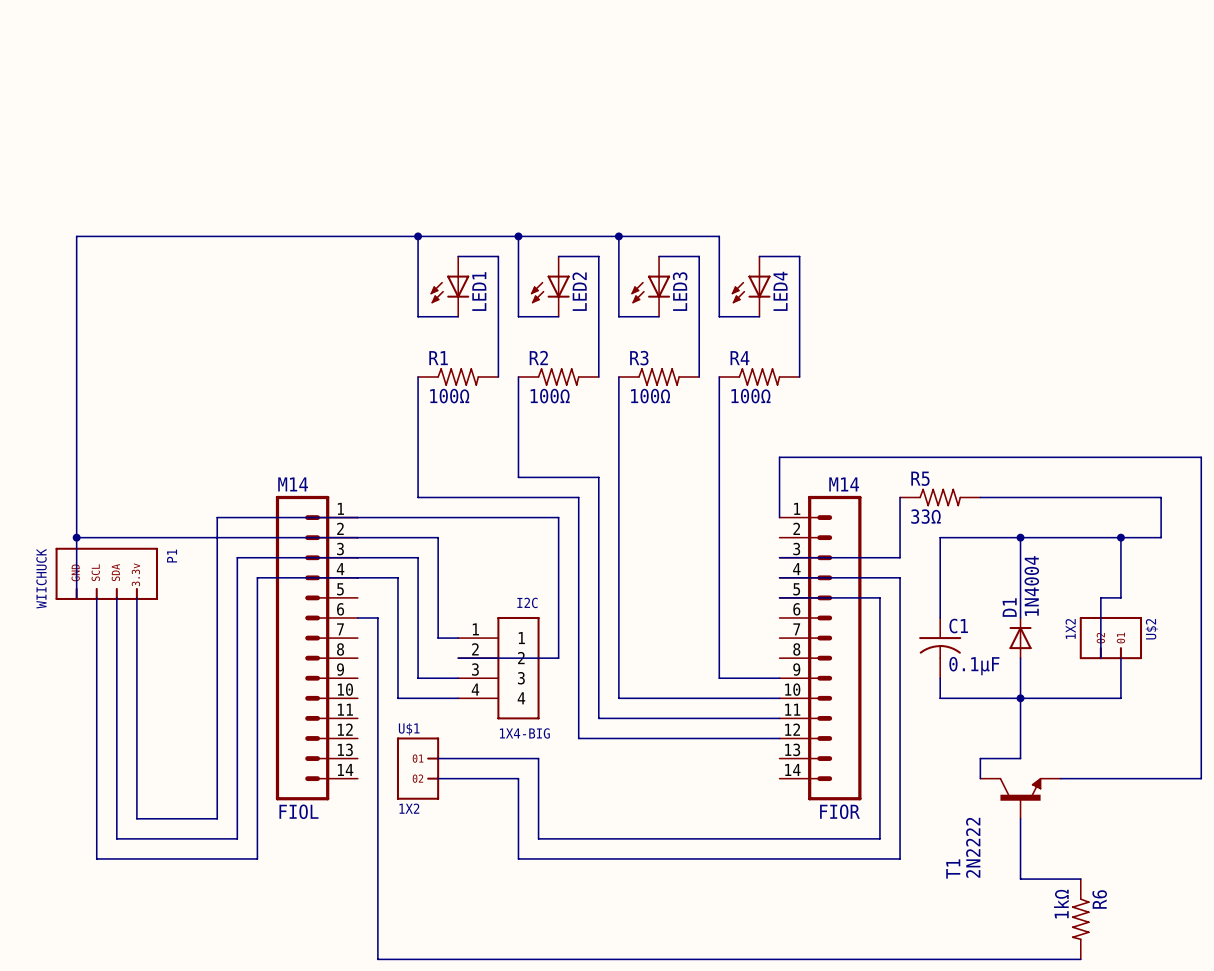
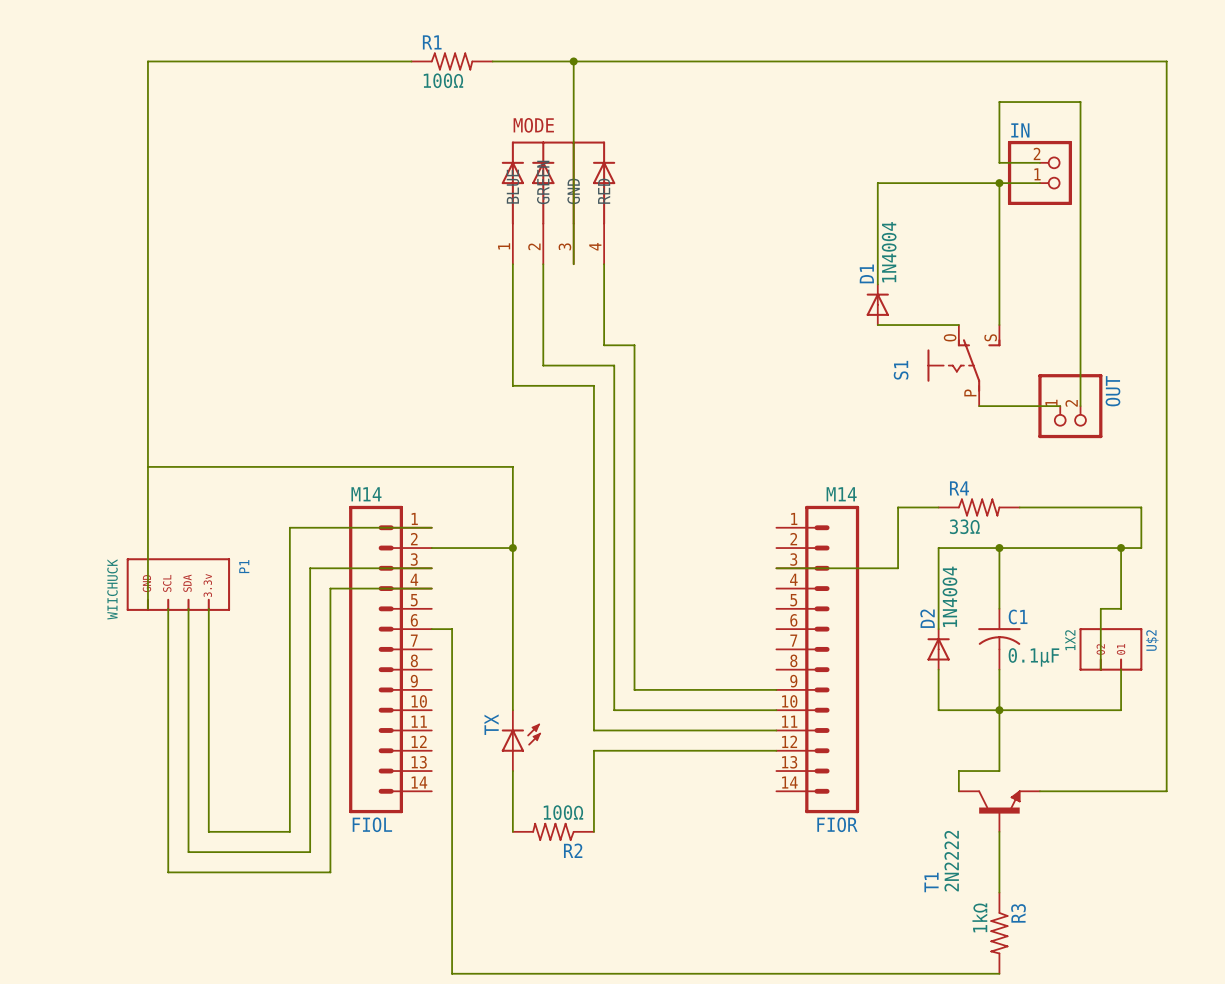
wire: none -> (411, 61) (147, 61) (147, 608)
wire: none -> (573, 61) (573, 264)
junction: none -> (573, 61)
wire: none -> (1039, 162) (999, 162) (999, 102) (1080, 102) (1080, 406)
IN: none -> (1039, 172)
wire: none -> (999, 183) (999, 325)
junction: none -> (999, 183)
wire: none -> (1039, 183) (877, 183) (877, 284)
MODE: none -> (558, 202)
wire: (418, 236) (418, 316) (458, 316) -> none
junction: (418, 236) -> none
junction: (518, 236) -> none
wire: (618, 236) (618, 316) (659, 316) -> none
junction: (618, 236) -> none
wire: (458, 256) (498, 256) (498, 376) -> none
wire: none -> (543, 264) (543, 365) (614, 365) (614, 385)
wire: (558, 256) (598, 256) (598, 376) -> none
wire: (659, 256) (699, 256) (699, 376) -> none
wire: (759, 256) (799, 256) (799, 376) -> none
LED1: (449, 286) -> none
LED2: (550, 286) -> none
LED3: (650, 286) -> none
LED4: (751, 286) -> none
wire: (518, 316) (558, 316) -> none
wire: (759, 316) (719, 316) (719, 236) (76, 236) (76, 597) -> none
wire: none -> (877, 325) (958, 325)
S1: none -> (963, 365)
wire: (418, 376) (418, 497) (578, 497) (578, 738) (598, 738) -> (593, 831) (593, 750)
R1 position: (458, 376) -> (452, 61)
wire: (518, 376) (518, 457) -> (147, 466) (512, 466)
R2 rotation: 0° (558, 376) -> 180° (553, 831)
R2 position: (558, 376) -> (553, 831)
R3 rotation: 0° (659, 376) -> 90° clockwise (999, 933)
R3 position: (659, 376) -> (999, 933)
wire: (719, 376) (719, 678) -> (604, 264) (604, 345) (634, 345) (634, 689) (715, 689)
R4 position: (759, 376) -> (979, 507)
R3 value: 100Ω (650, 396) -> 1kΩ (979, 917)
R4 value: 100Ω (750, 396) -> 33Ω (964, 526)
wire: none -> (979, 406) (1060, 406)
OUT: none -> (1070, 406)
wire: (518, 477) (598, 477) -> (512, 325) (512, 385) (593, 385) (593, 487)
wire: none -> (512, 487) (512, 710)
R5: 33Ω (940, 497) -> none
wire: (1141, 497) (1161, 497) (1161, 537) (1141, 537) -> (1141, 507) (1141, 548)
wire: (297, 517) (217, 517) (217, 597) -> none
wire: (438, 517) (558, 517) (558, 658) (458, 658) -> none
wire: (779, 517) (779, 457) (1201, 457) (1201, 778) (1166, 778) -> (492, 61) (1166, 61) (1166, 791)
wire: (76, 537) (438, 537) (438, 638) (458, 638) -> none
junction: (76, 537) -> none
wire: none -> (431, 548) (512, 548)
junction: none -> (512, 548)
wire: none -> (999, 548) (999, 608)
wire: (1020, 537) (1020, 617) -> none
junction position: (1020, 537) -> (999, 548)
wire: (317, 557) (237, 557) (237, 838) -> (310, 568) (310, 852) (229, 852)
wire: (418, 557) (418, 678) (458, 678) -> (411, 568) (431, 568)
P1 position: (106, 573) -> (178, 584)
wire: (337, 577) (257, 577) (257, 858) -> (330, 588) (330, 872) (249, 872)
wire: (397, 577) (397, 698) (458, 698) -> (391, 588) (431, 588)
wire: (779, 577) (900, 577) (900, 858) (518, 858) (518, 818) -> none
wire: (96, 597) (96, 858) (177, 858) -> (168, 608) (168, 872)
wire: (116, 597) (116, 838) (197, 838) -> (188, 608) (188, 852)
wire: (136, 597) (136, 818) (217, 818) -> (289, 527) (289, 831) (208, 831)
wire: (779, 597) (879, 597) (879, 838) (538, 838) (538, 758) (438, 758) -> none
wire: (357, 617) (377, 617) (377, 959) (458, 959) -> (431, 629) (452, 629) (452, 973)
D2: none -> 1N4004 (938, 649)
D1 position: (1020, 638) -> (877, 304)
FIOL position: (316, 648) -> (390, 659)
C1 position: (940, 648) -> (999, 639)
wire: (1020, 658) (1020, 758) (1000, 758) -> (999, 669) (999, 771)
I2C: 1X4-BIG (498, 668) -> none
junction position: (1020, 698) -> (999, 710)
TX: none -> (521, 740)
wire: (980, 758) (980, 778) -> (979, 771) (958, 771) (958, 791)
U$1: 1X2 (418, 768) -> none
wire: (438, 778) (518, 778) -> (512, 771) (512, 791)
T1 position: (1020, 798) -> (999, 811)
wire: none -> (999, 831) (999, 892)
wire: (1020, 818) (1020, 879) (1080, 879) -> none
R6: 1kΩ (1080, 919) -> none
wire: (1000, 959) (1080, 959) -> none

